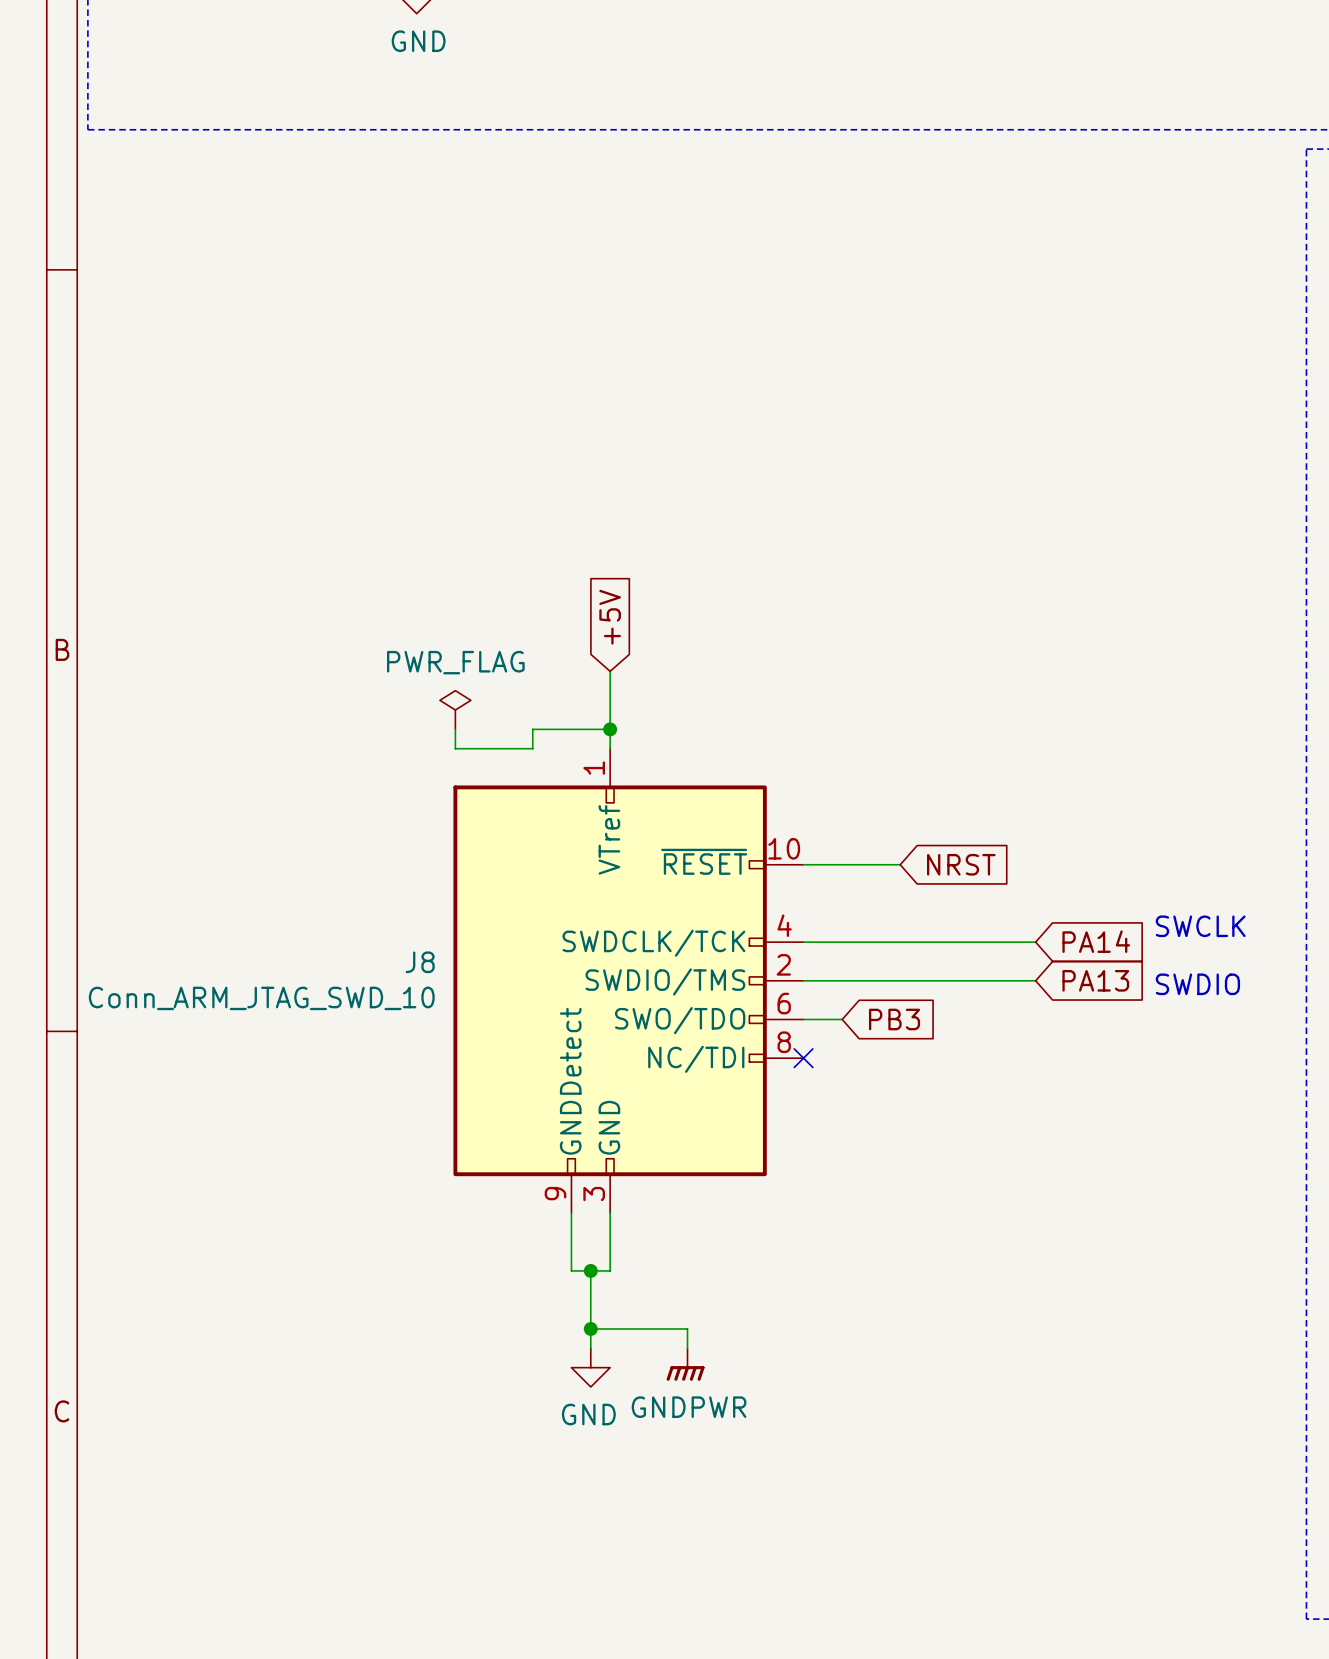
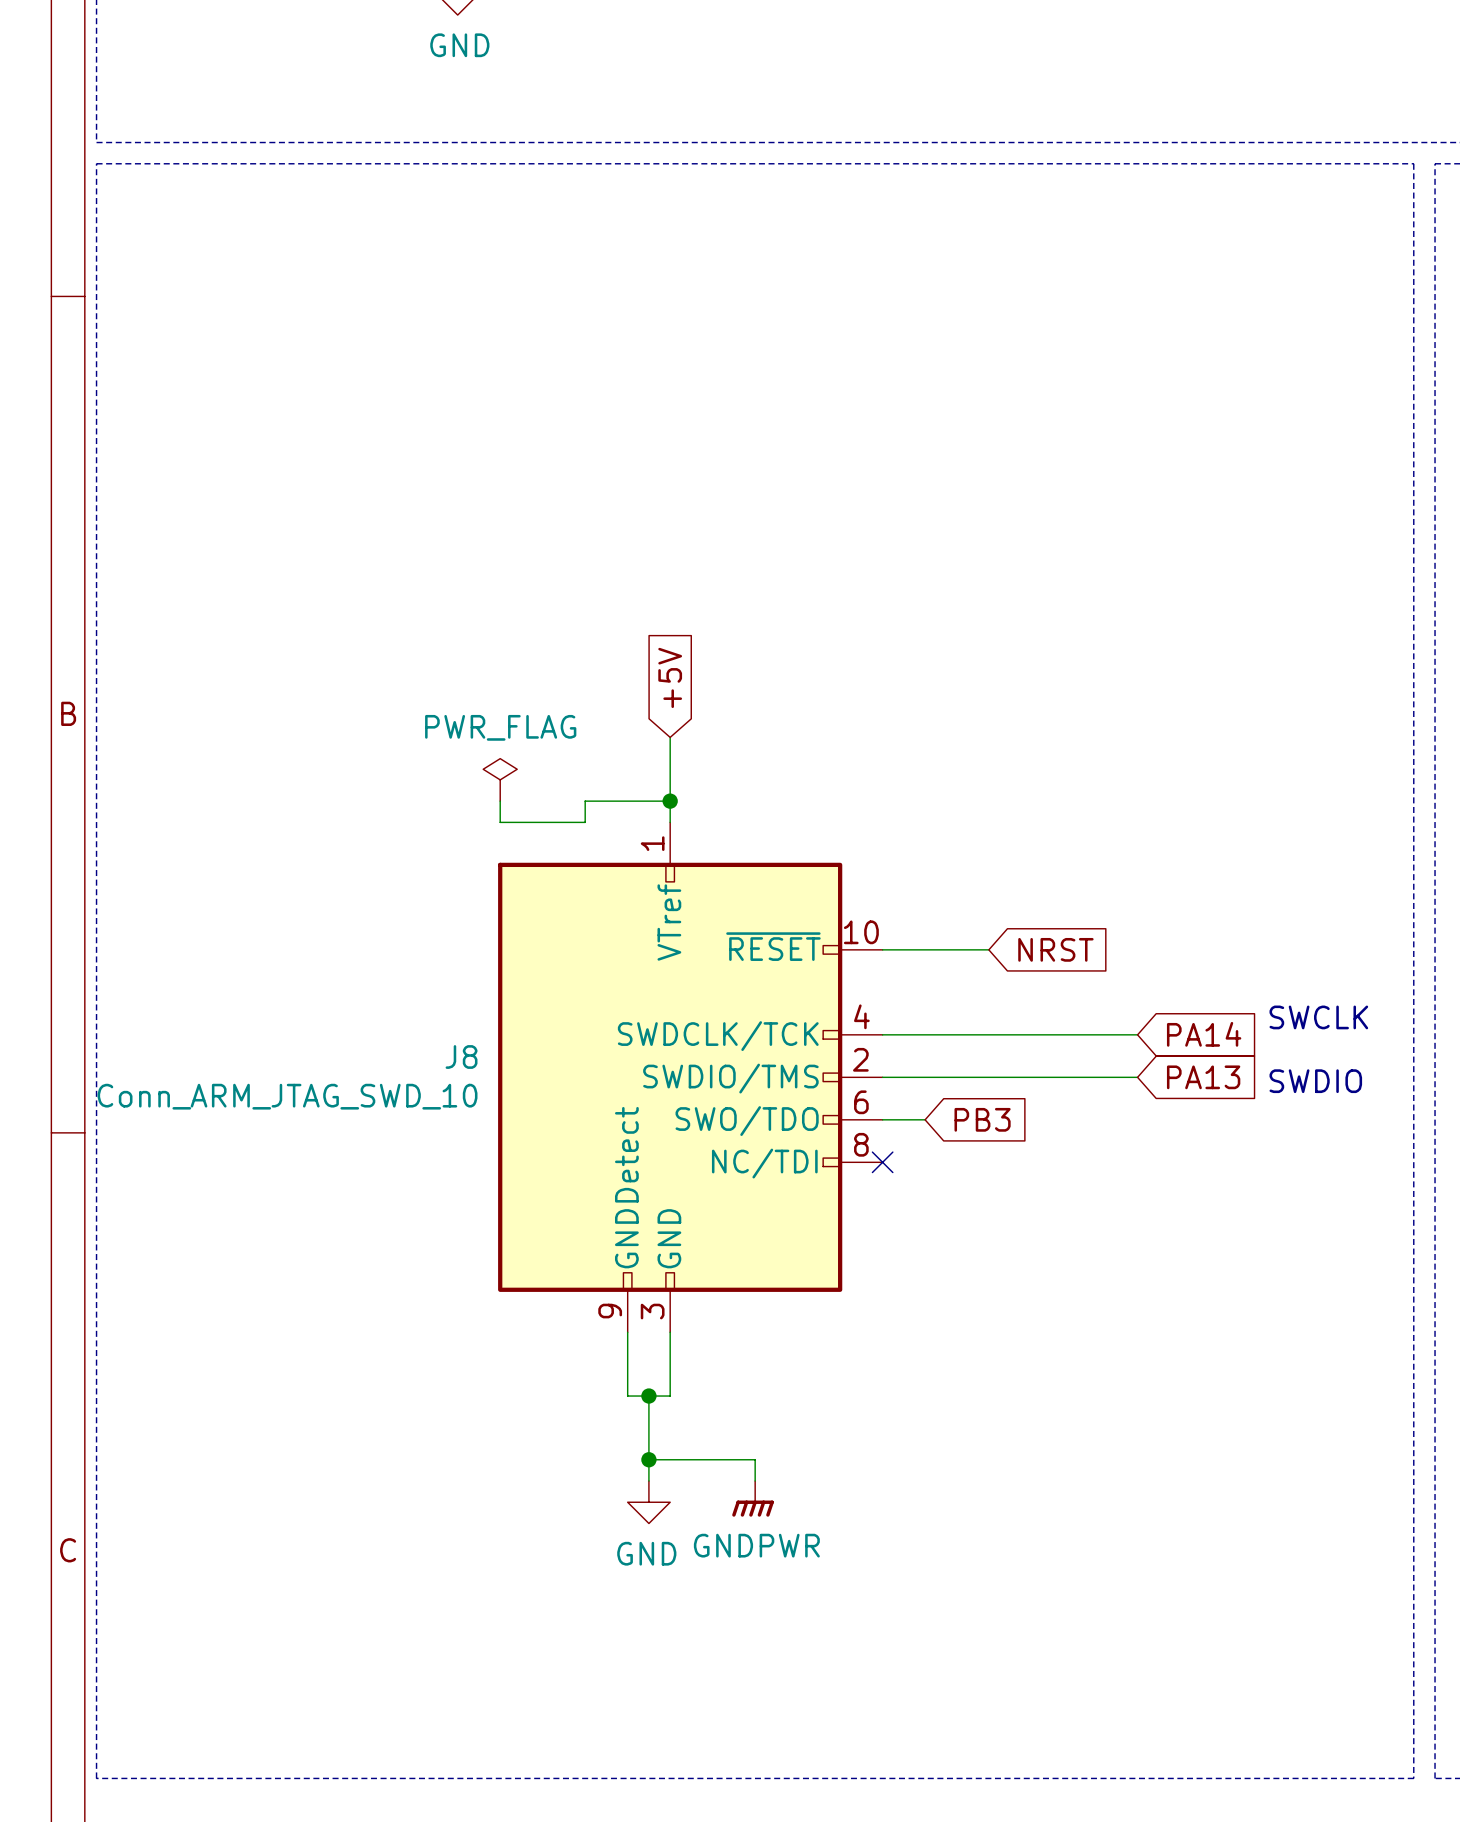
line: none -> (96, 163) (1413, 163) (1413, 1778) (96, 1778) (96, 163)

